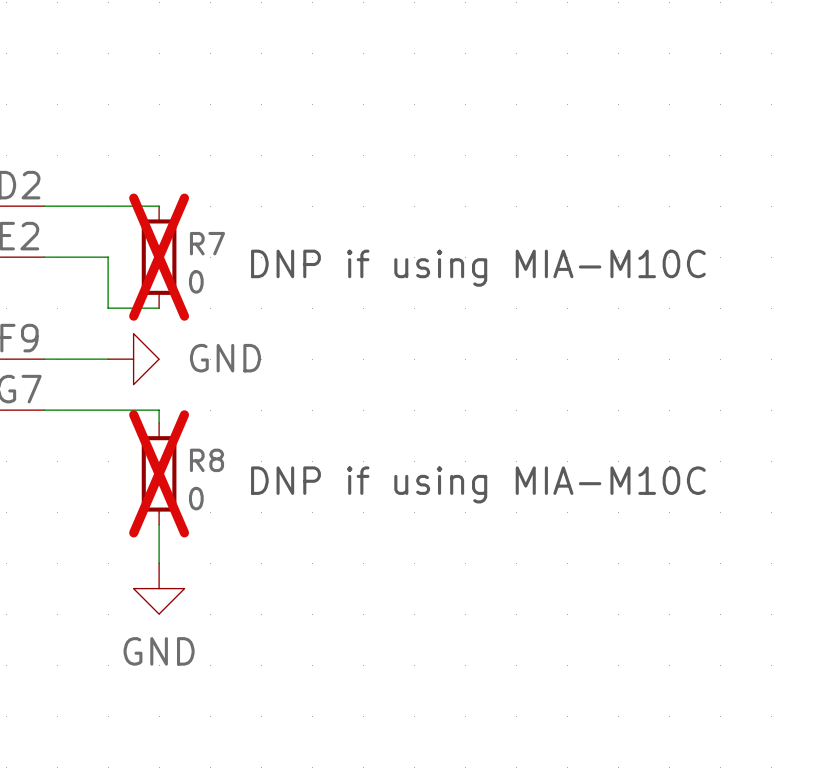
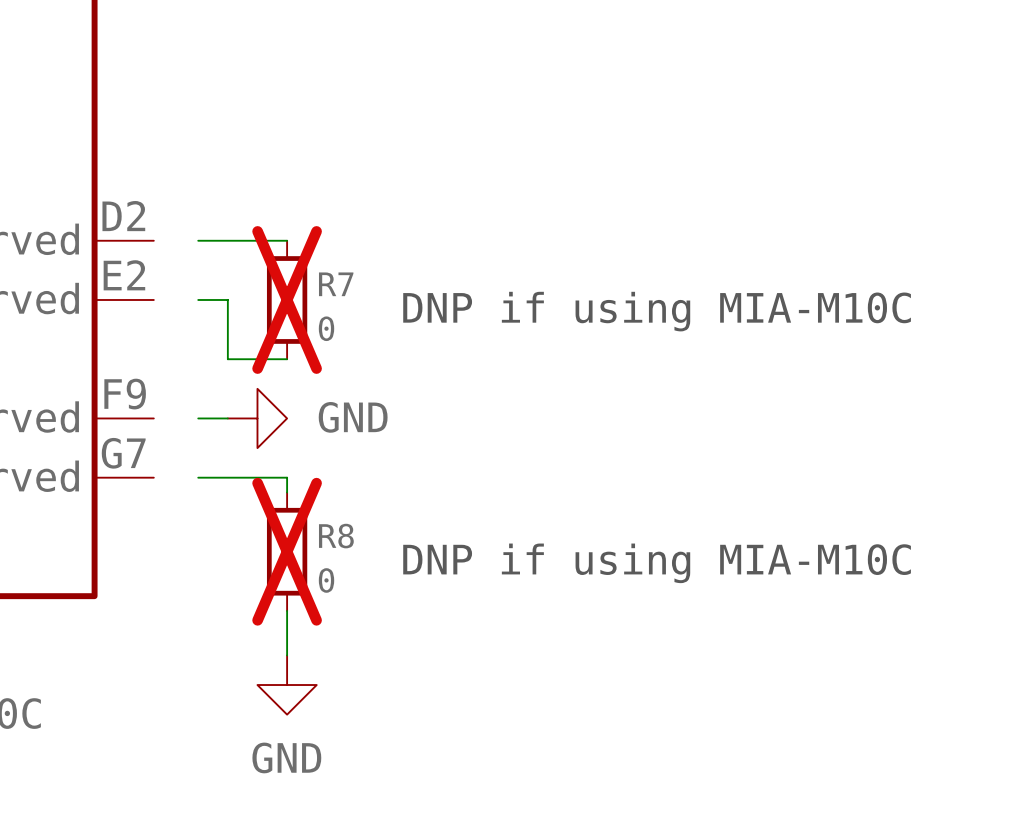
wire: (44, 206) (82, 206) -> none
wire: (44, 257) (82, 257) -> none
wire: (44, 359) (82, 359) -> none
wire: (44, 410) (82, 410) -> none

